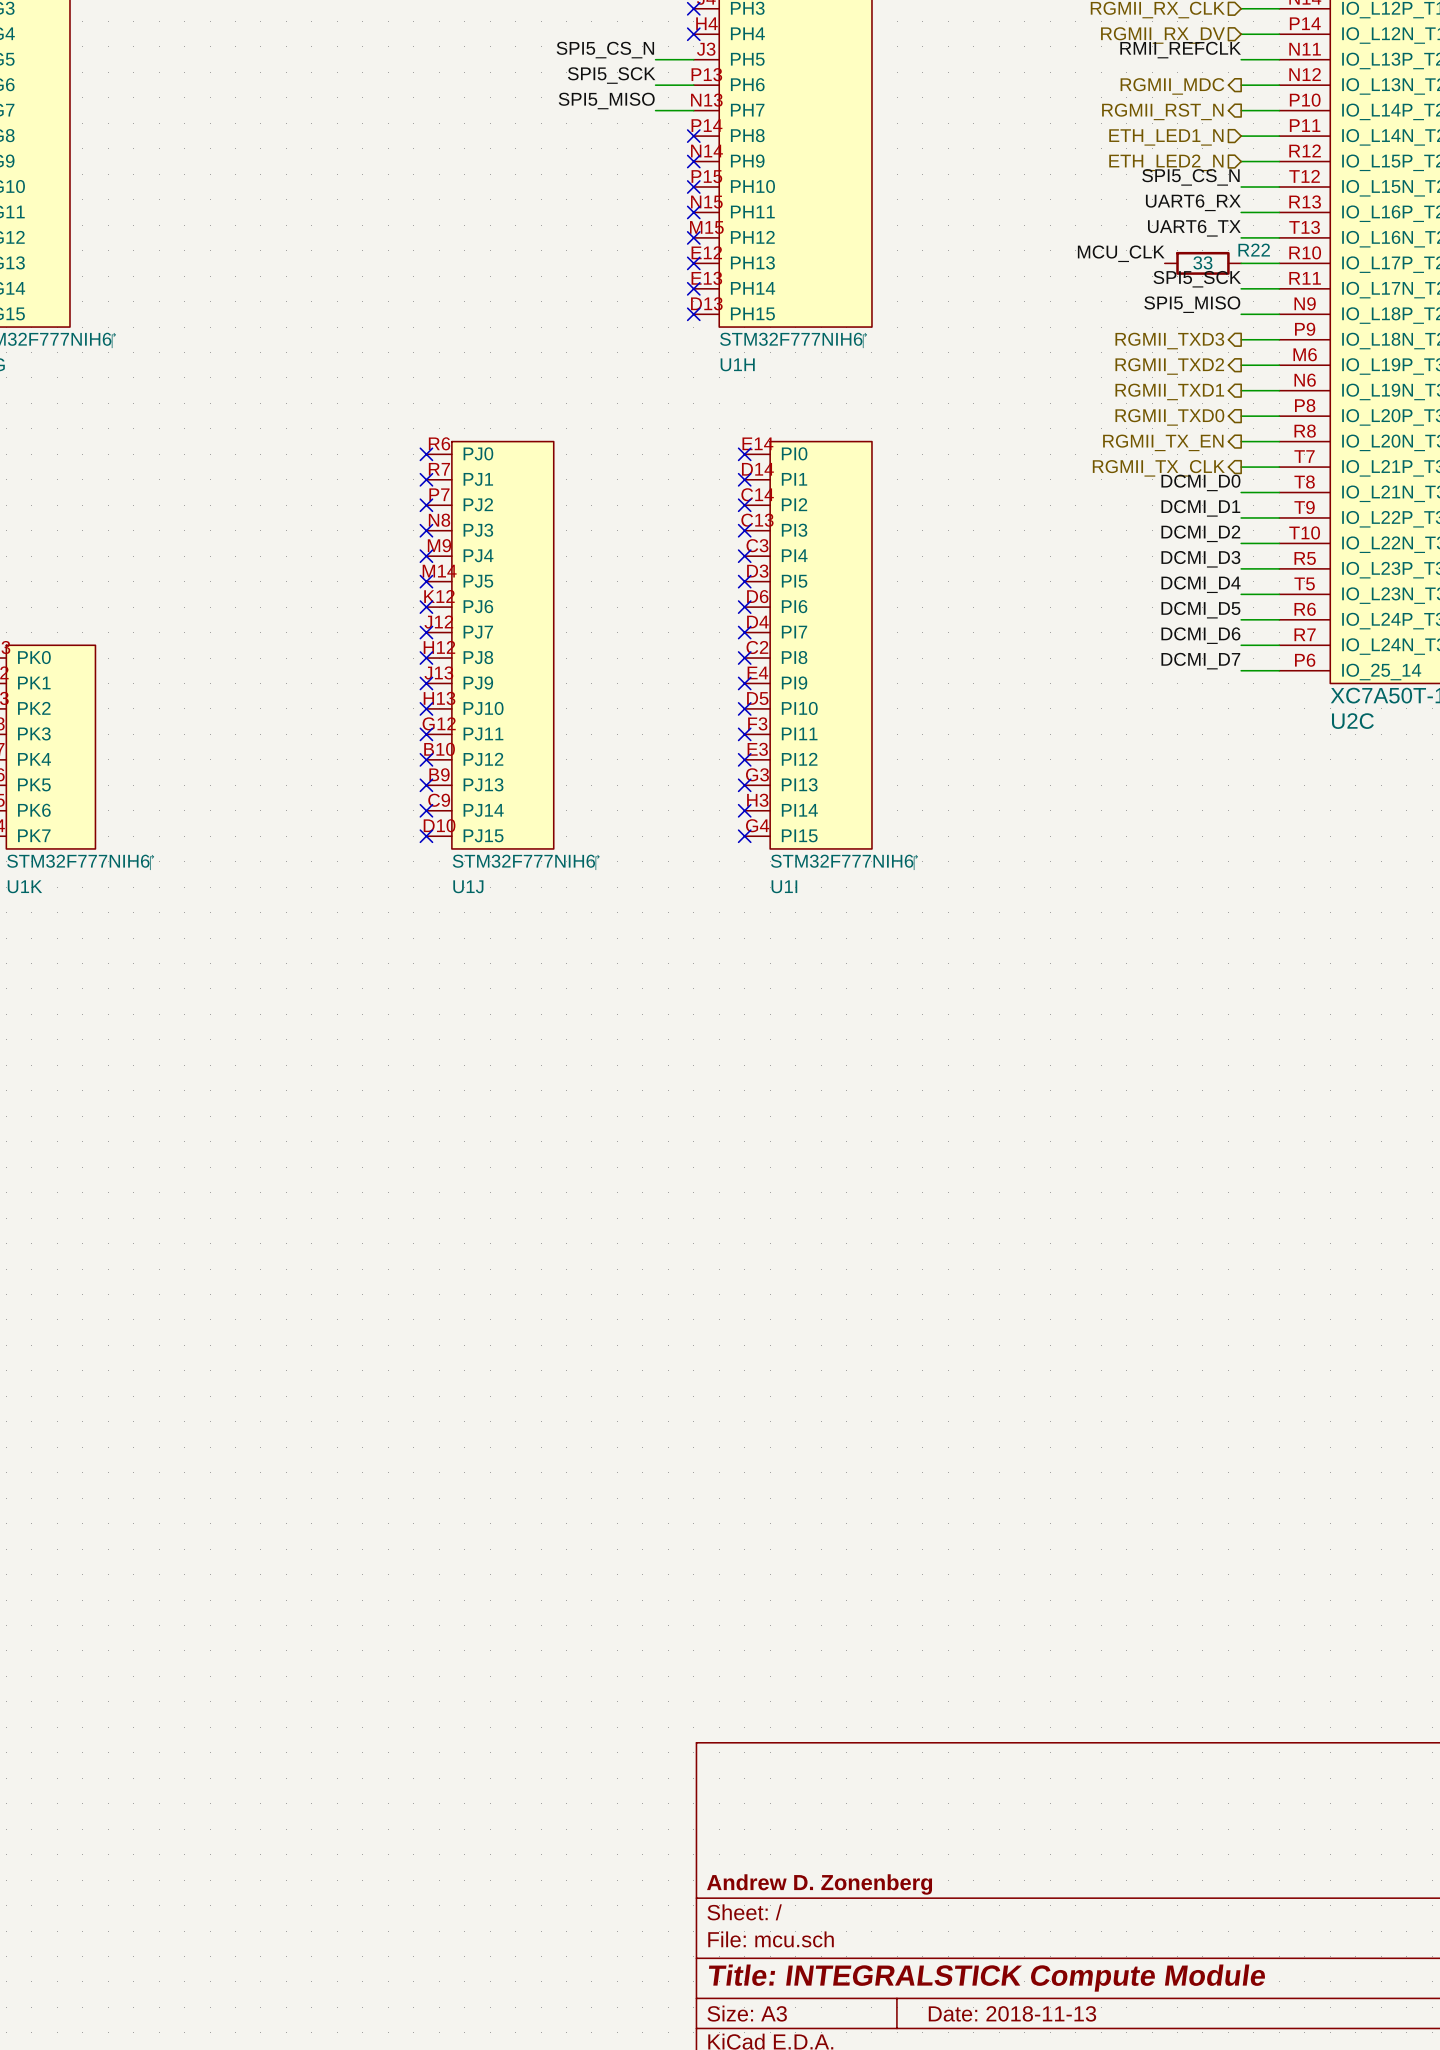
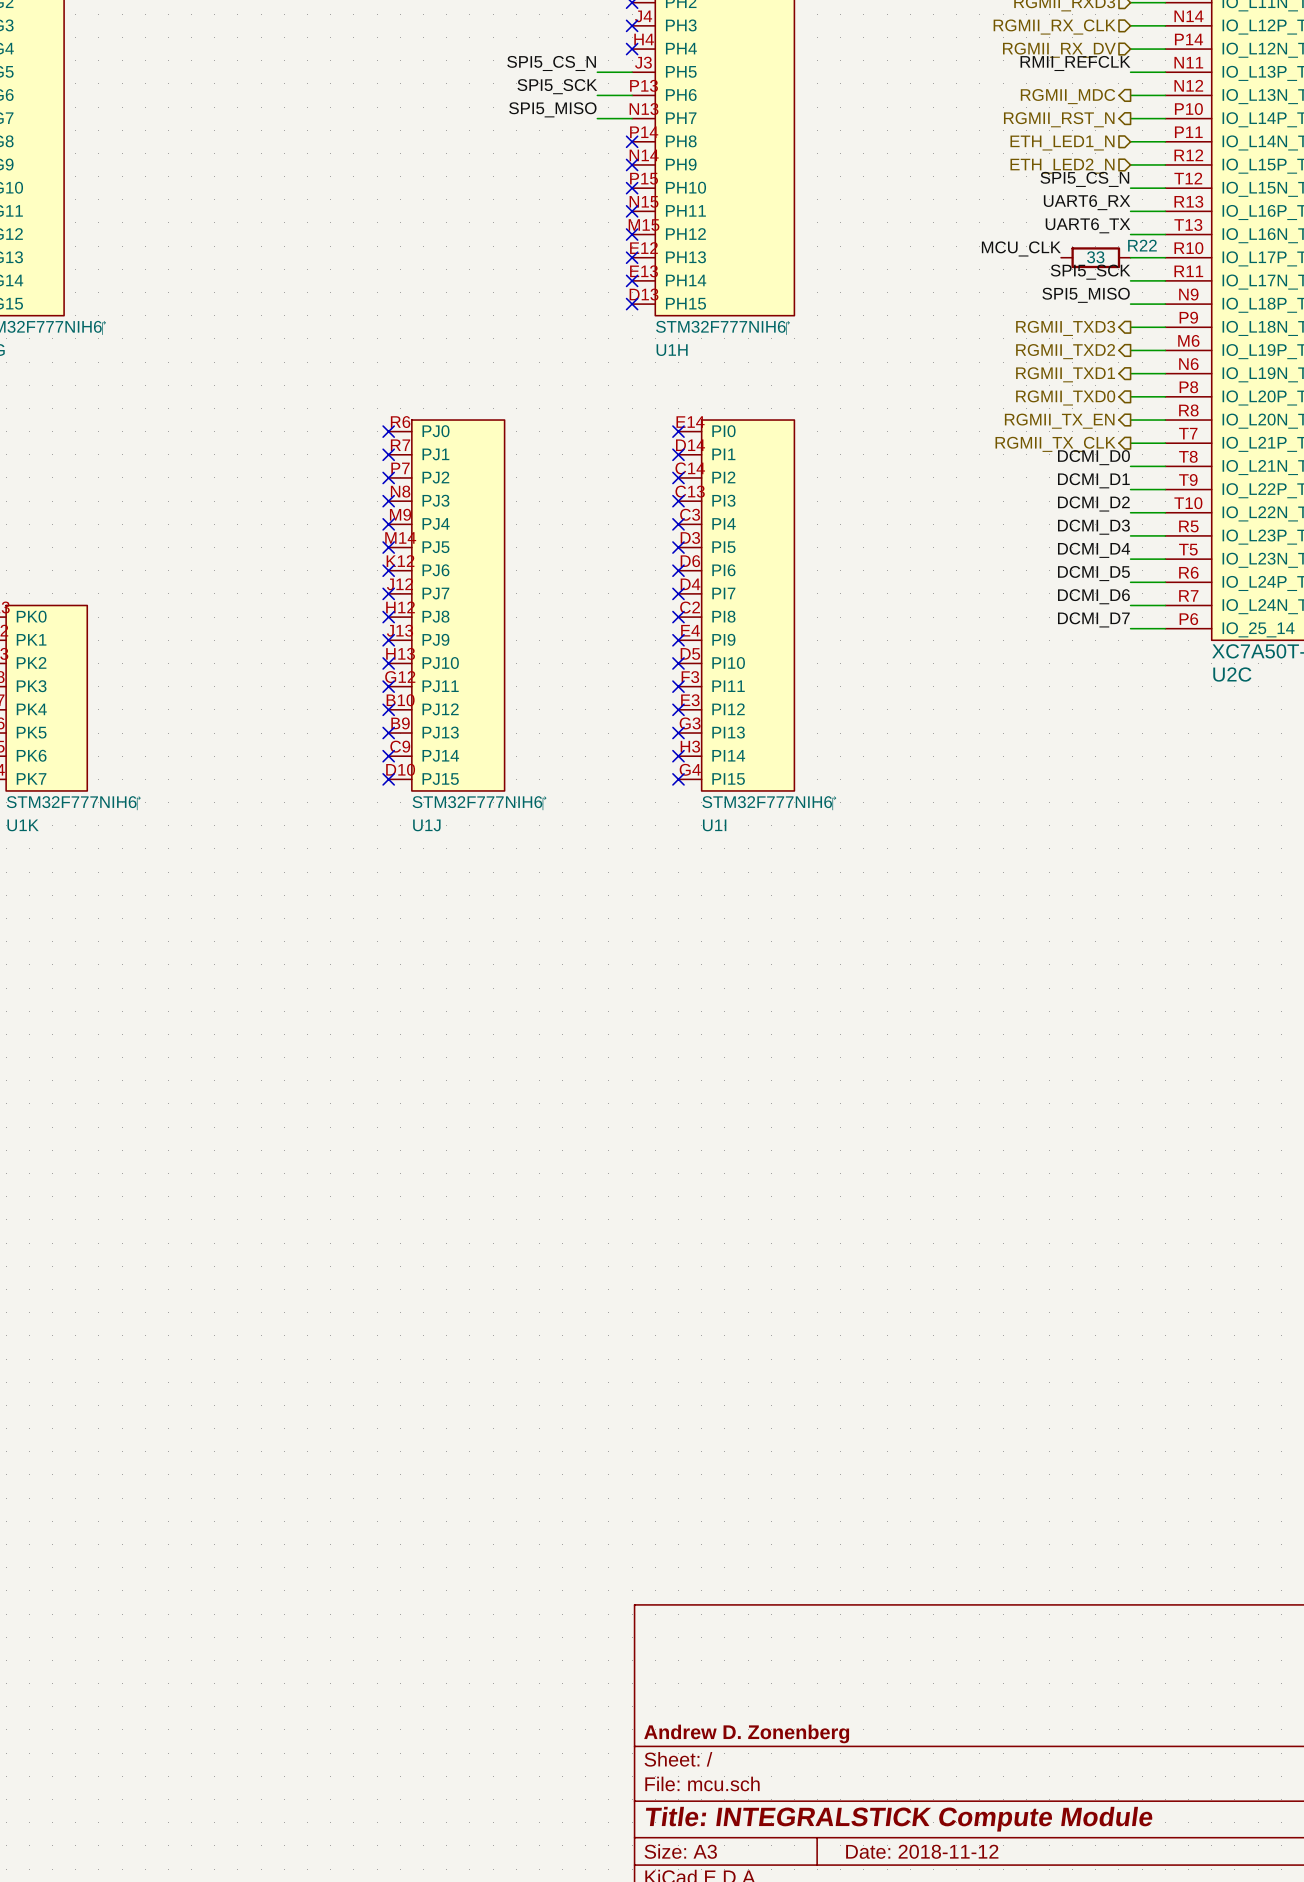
title block: Date: 2018-11-13 (1012, 2013) -> Date: 2018-11-12 (922, 1851)

